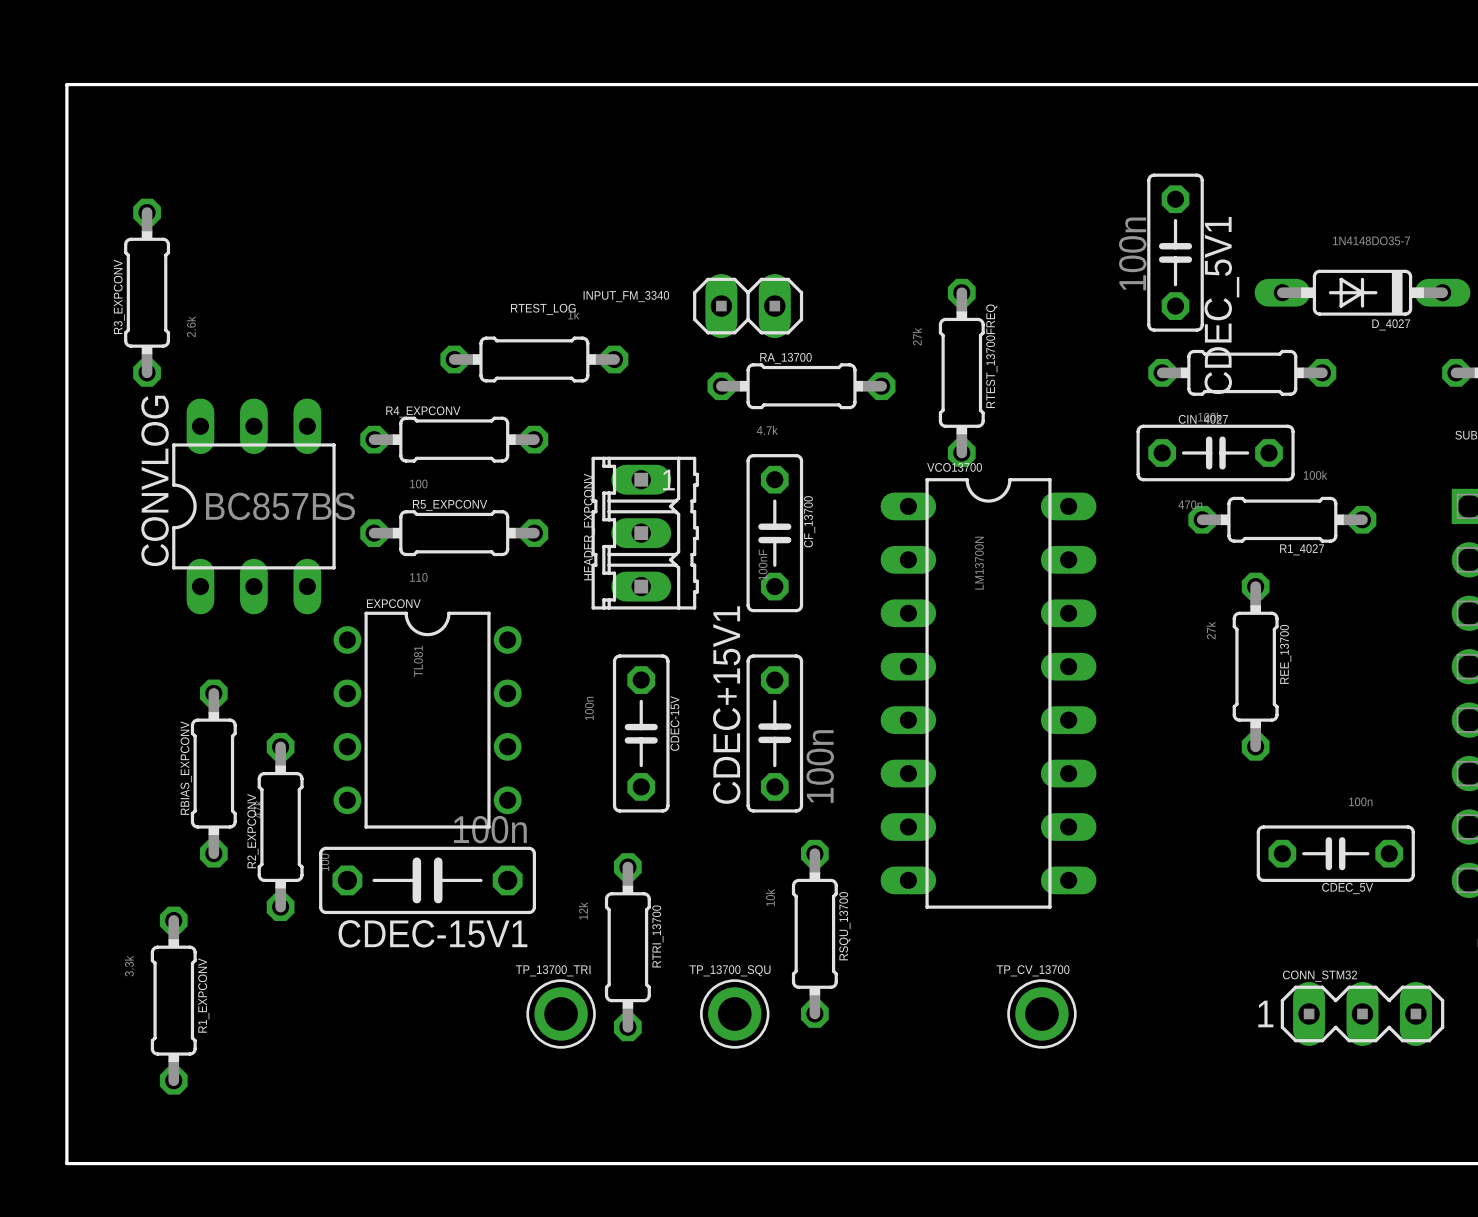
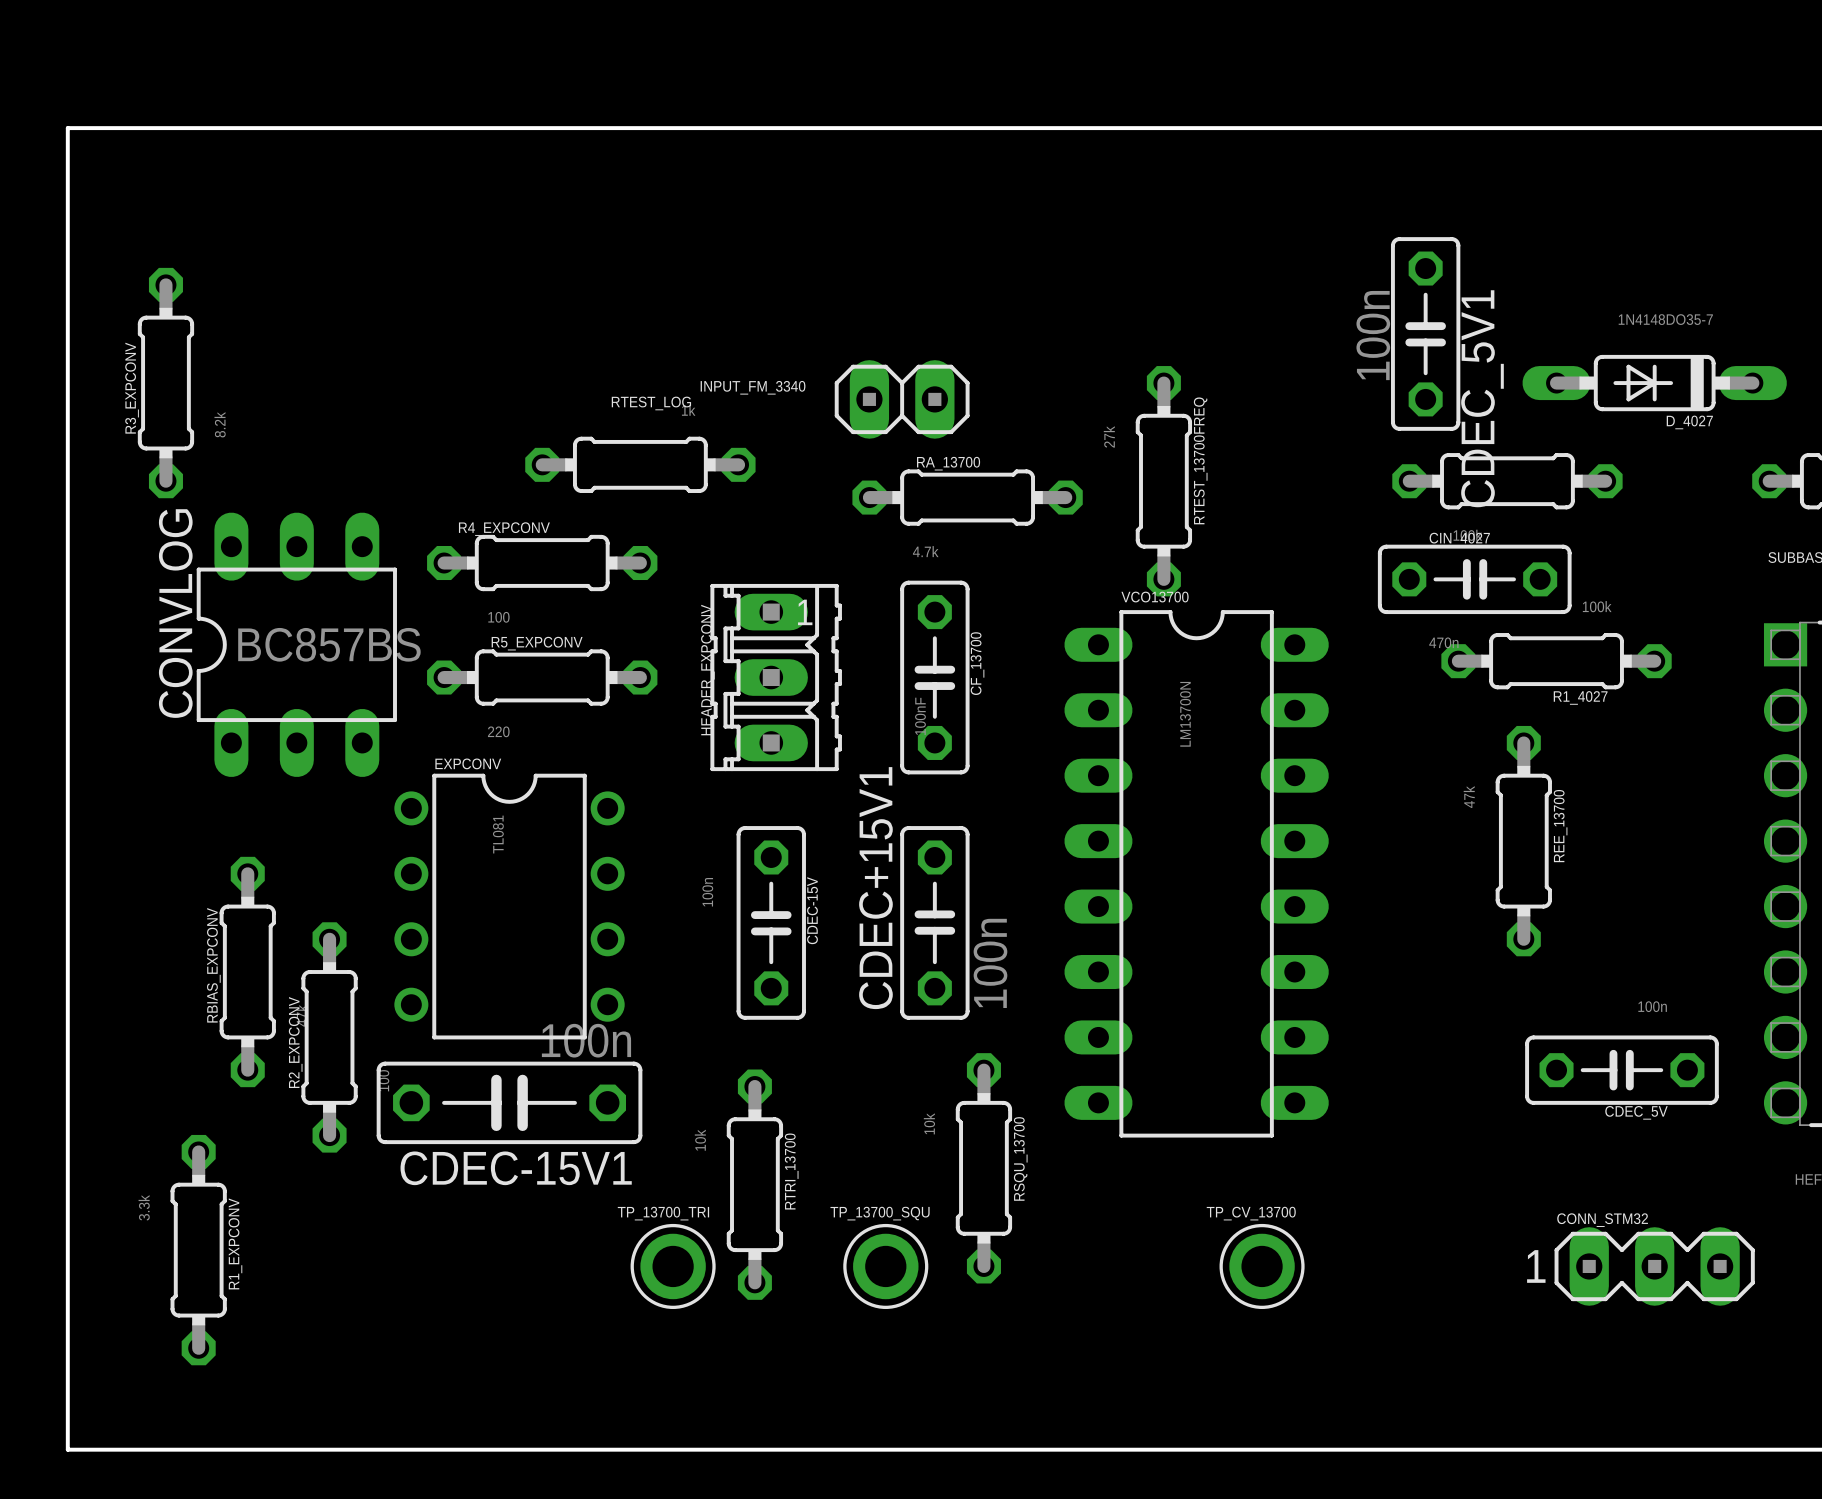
R3_EXPCONV value: 2.6k (191, 326) -> 8.2k (220, 424)
R5_EXPCONV value: 110 (418, 577) -> 220 (498, 731)
REE_13700 value: 27k (1211, 630) -> 47k (1469, 797)
RTRI_13700 value: 12k (583, 910) -> 10k (700, 1140)

